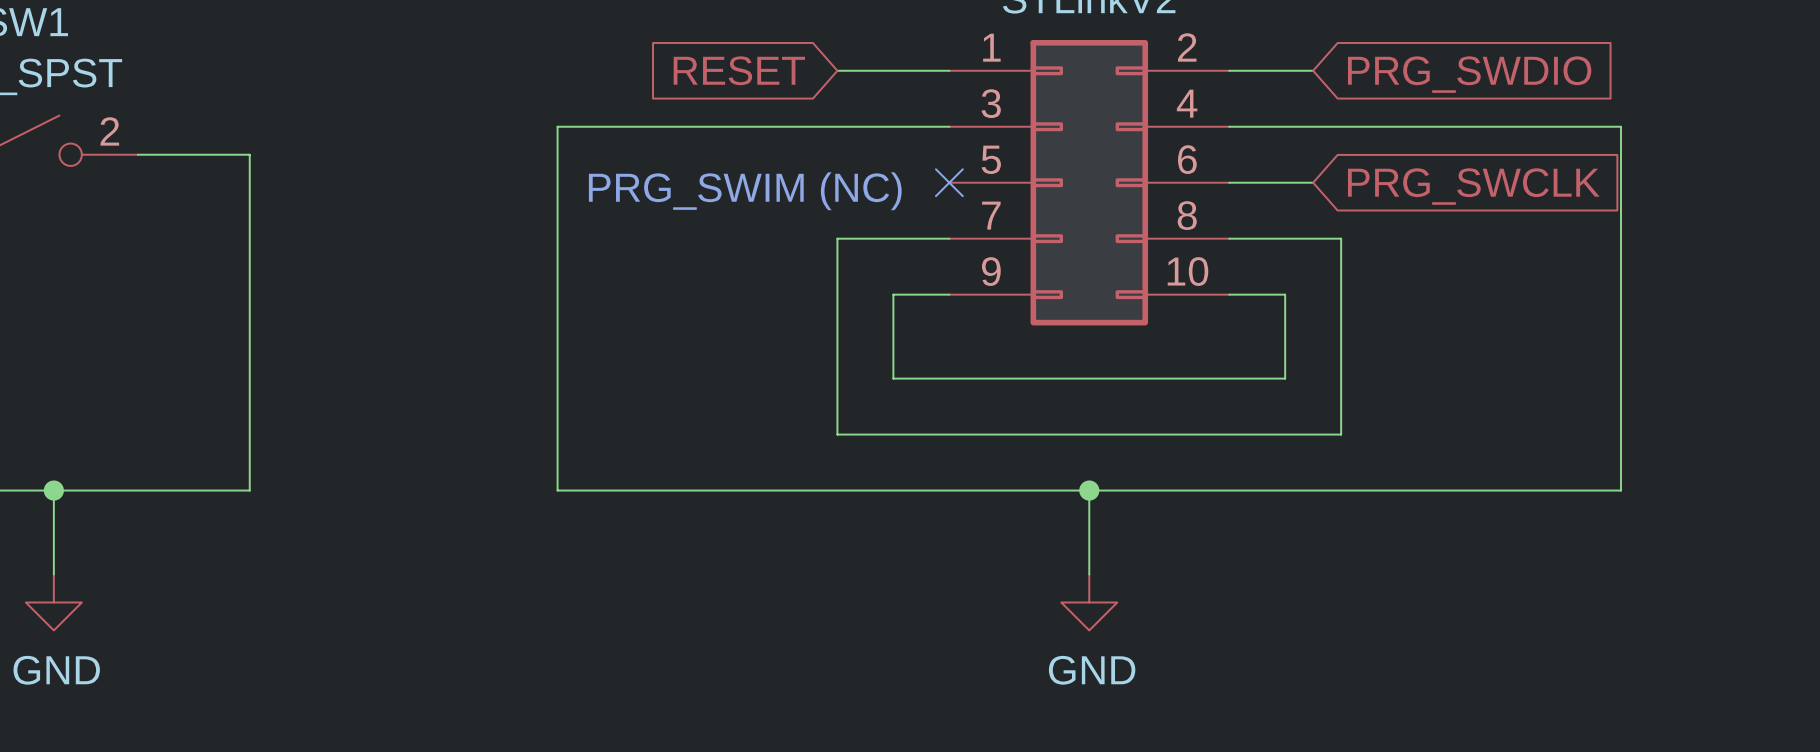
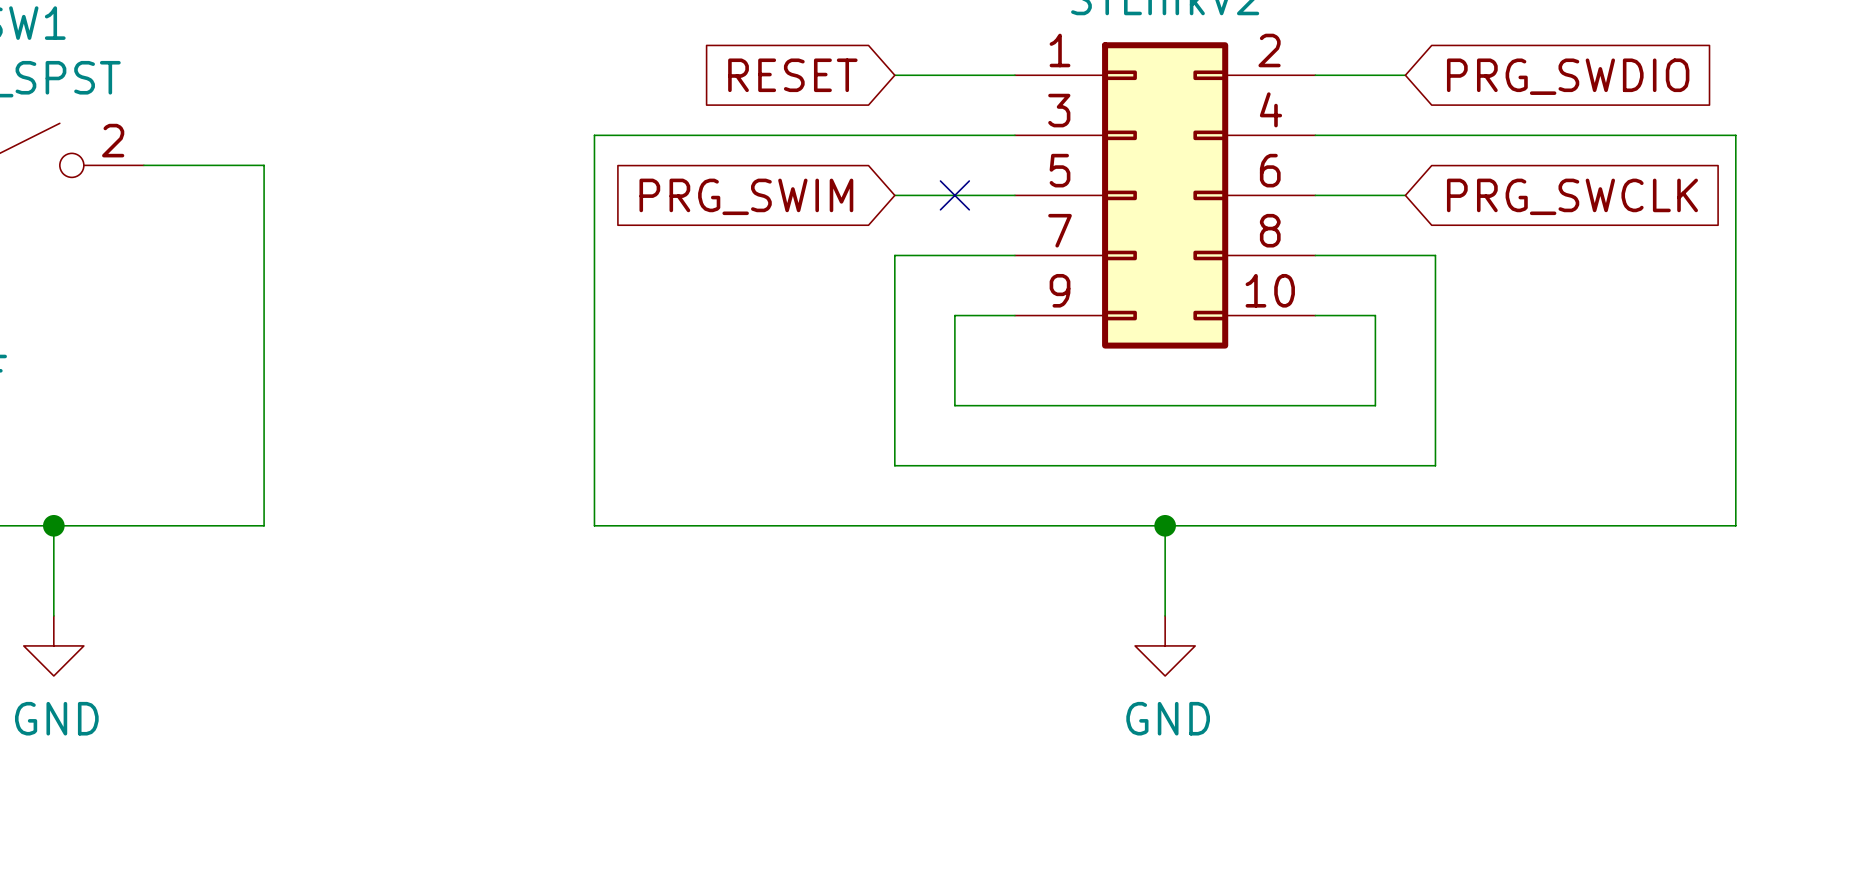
wire: none -> (894, 195) (1014, 195)
no-connect mark position: (949, 182) -> (954, 195)
global label: none -> PRG_SWIM (746, 196)
text: PRG_SWIM (NC) (745, 191) -> none

